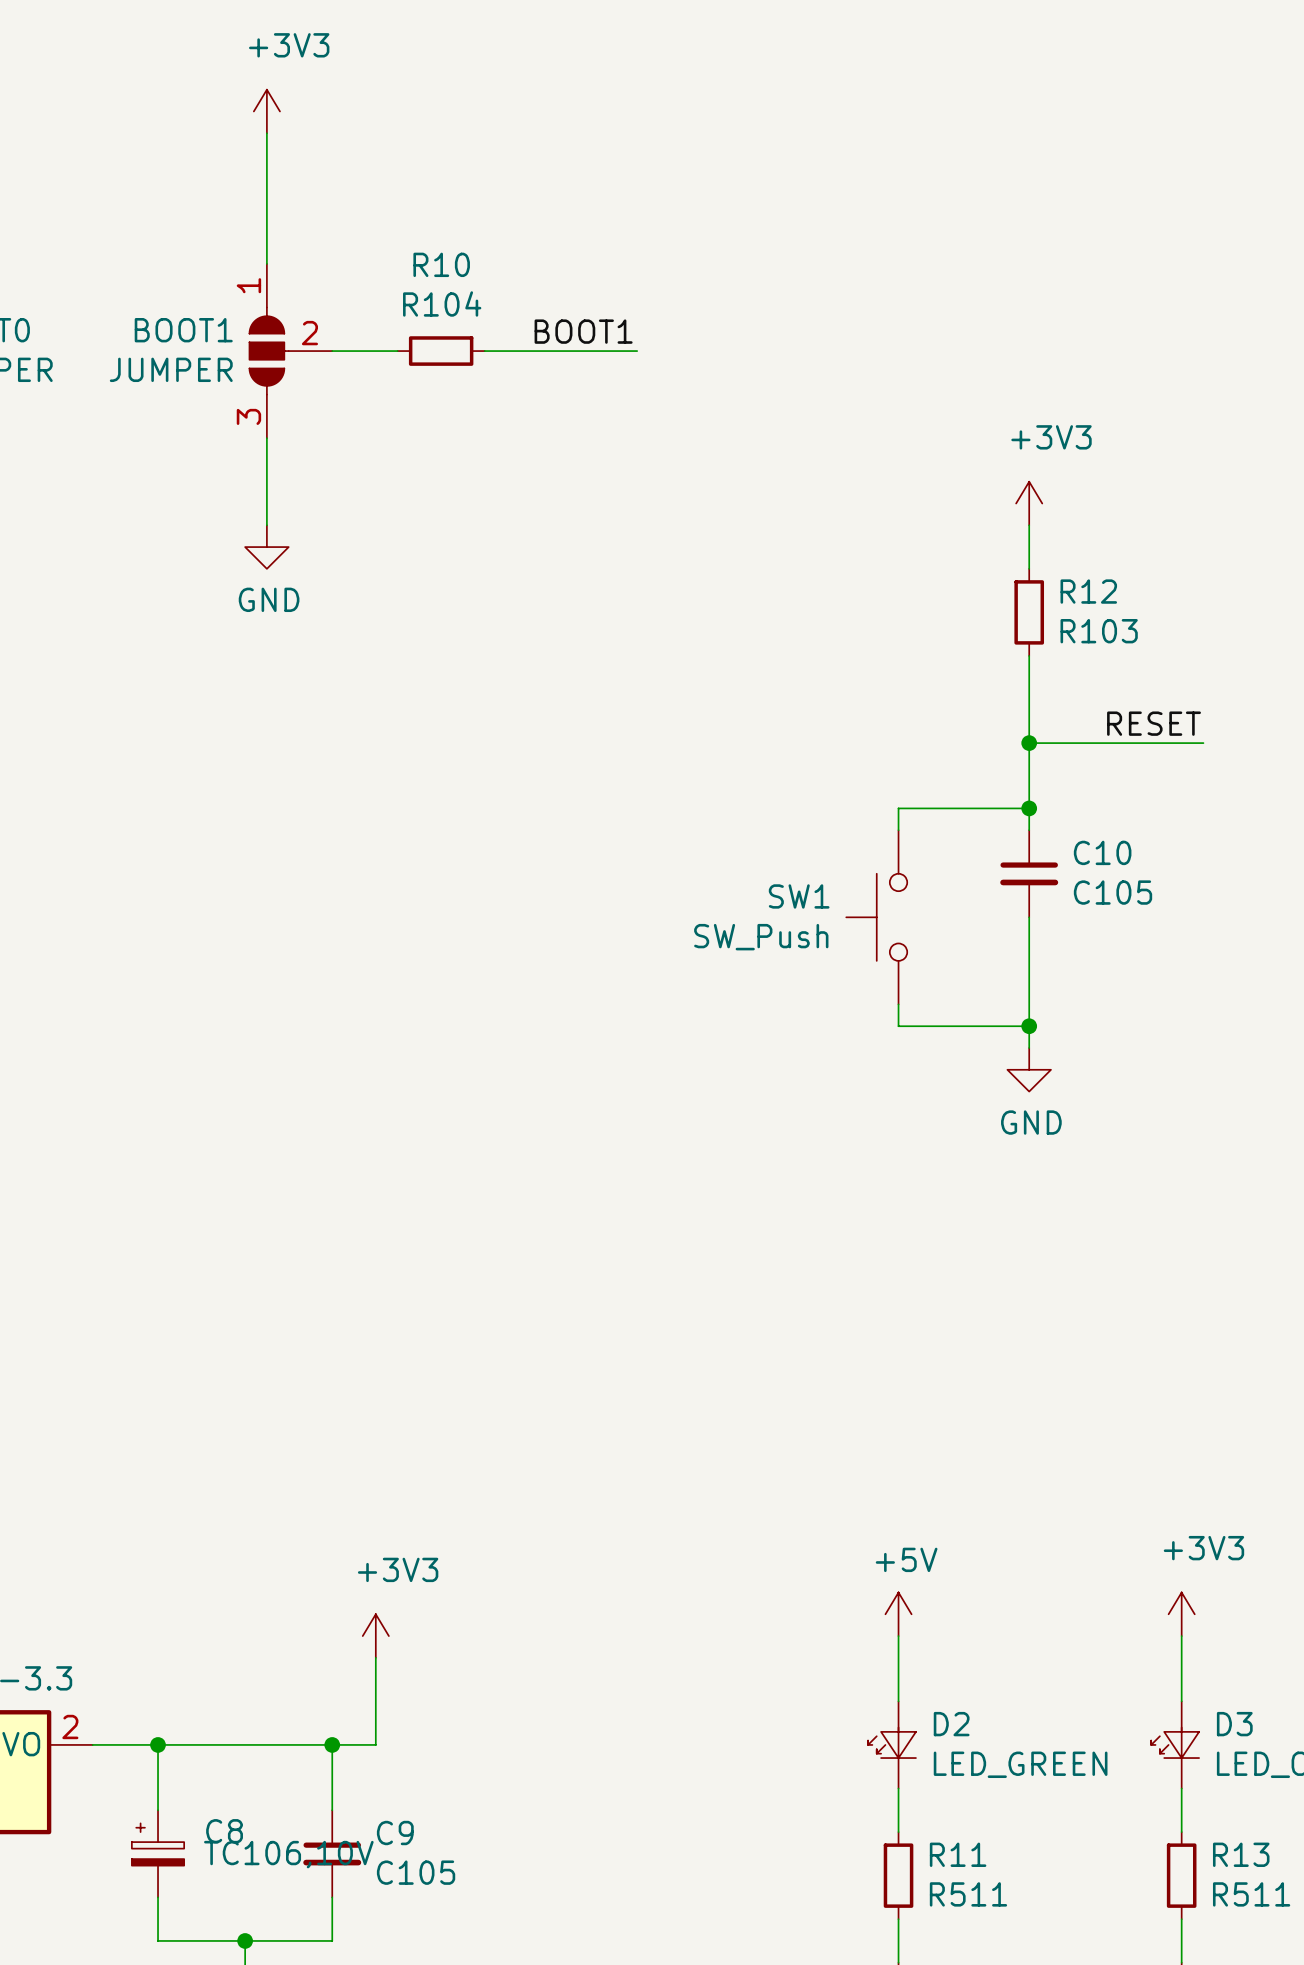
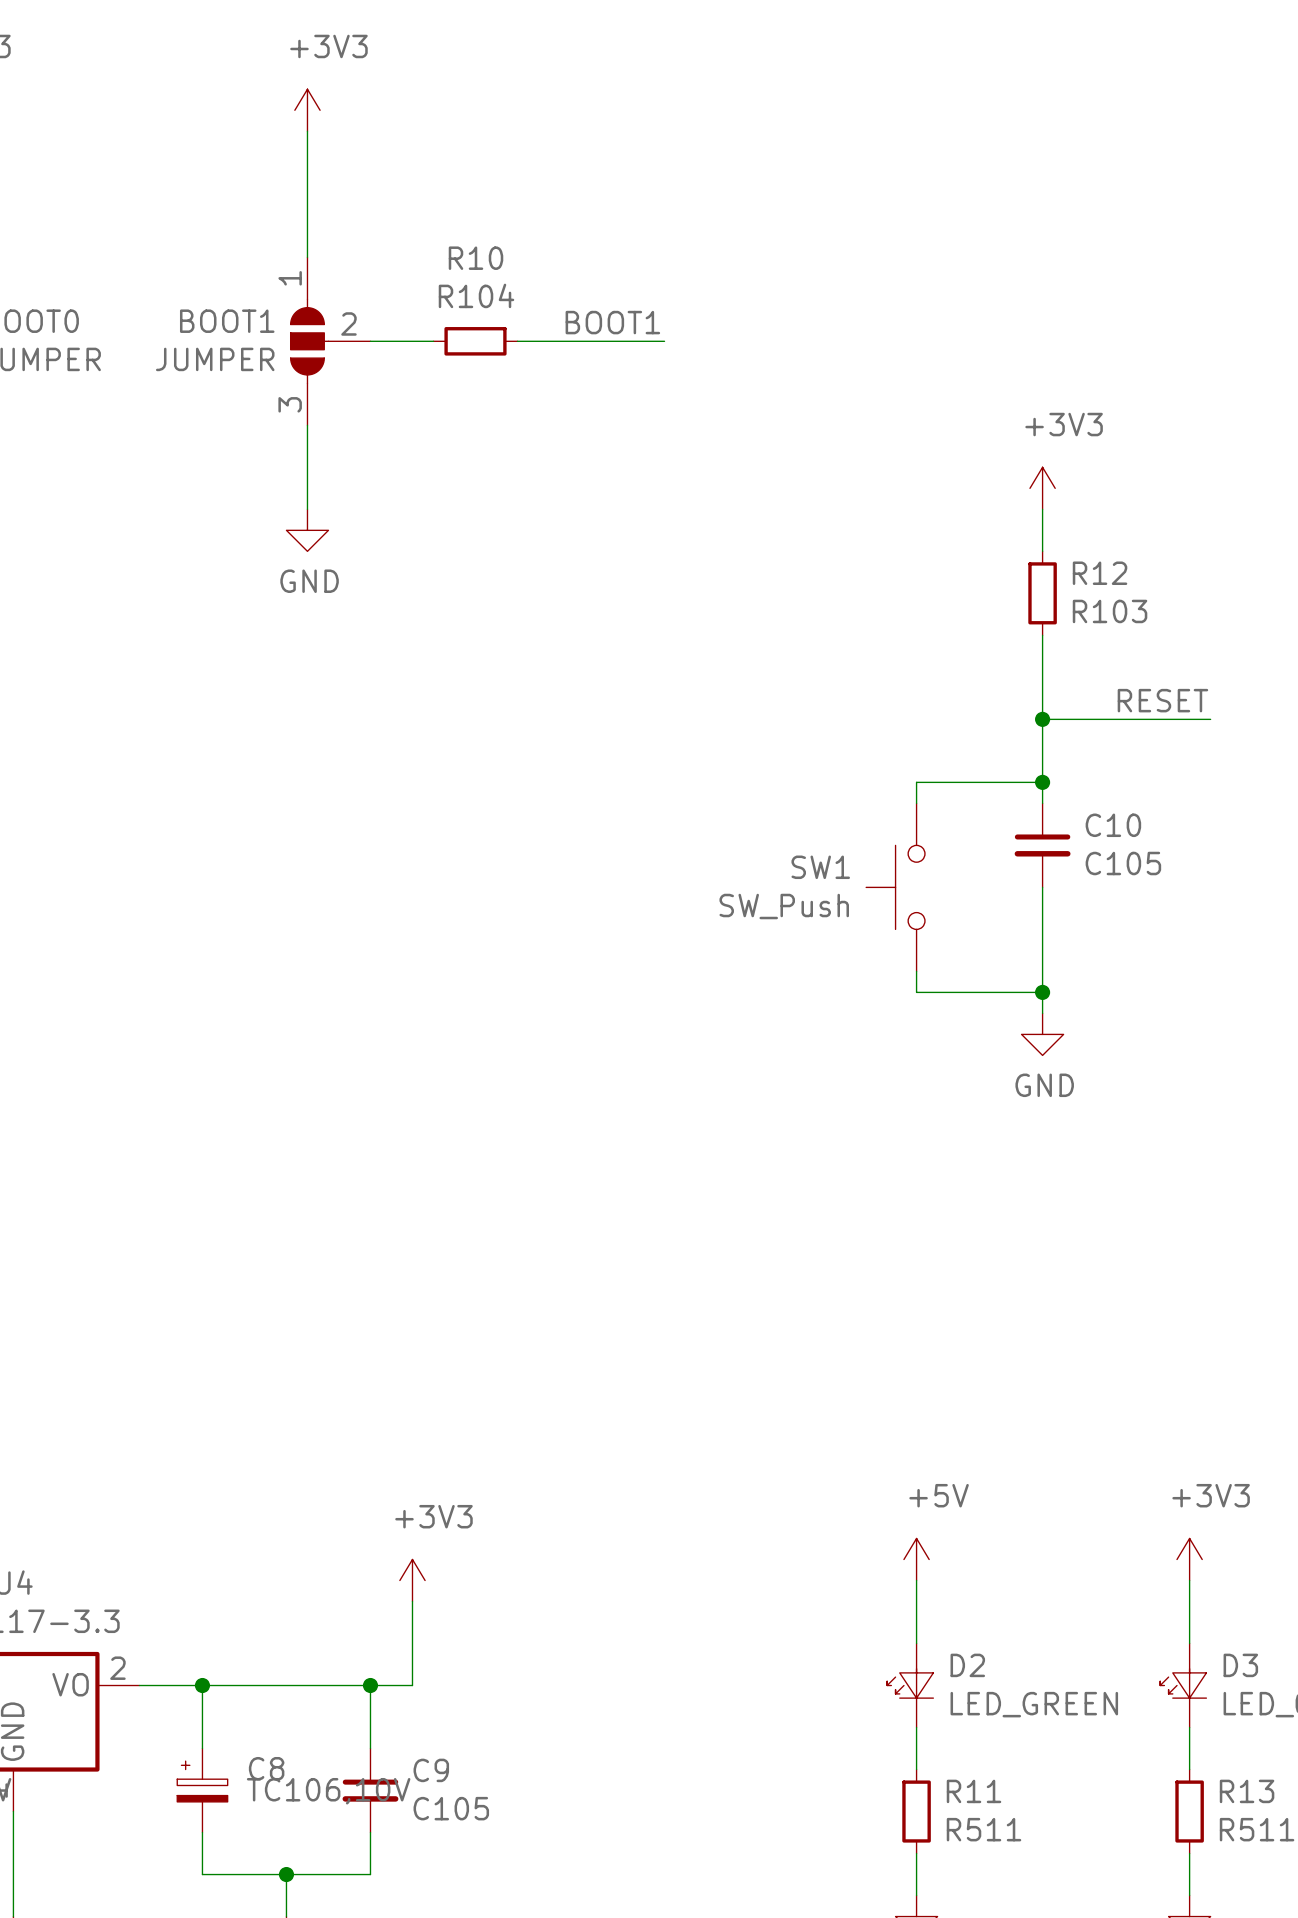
power symbol text position: +5V (906, 1559) -> +5V (939, 1495)

